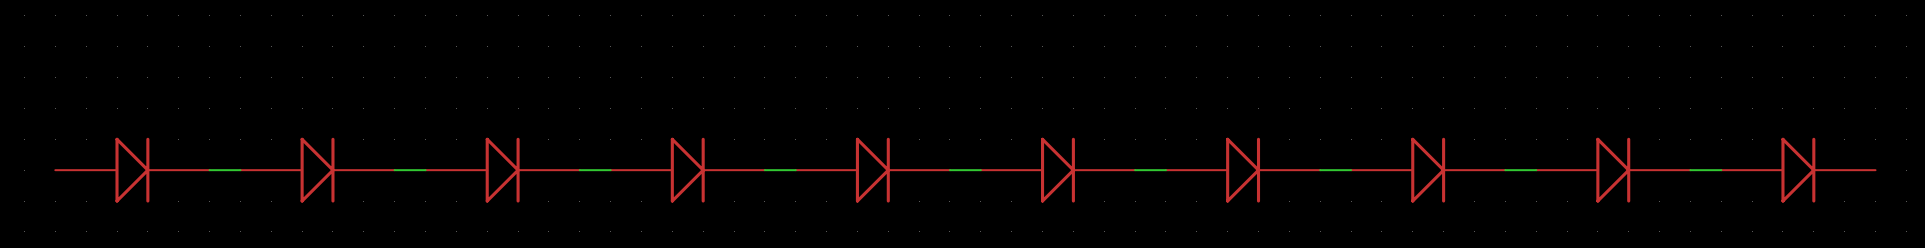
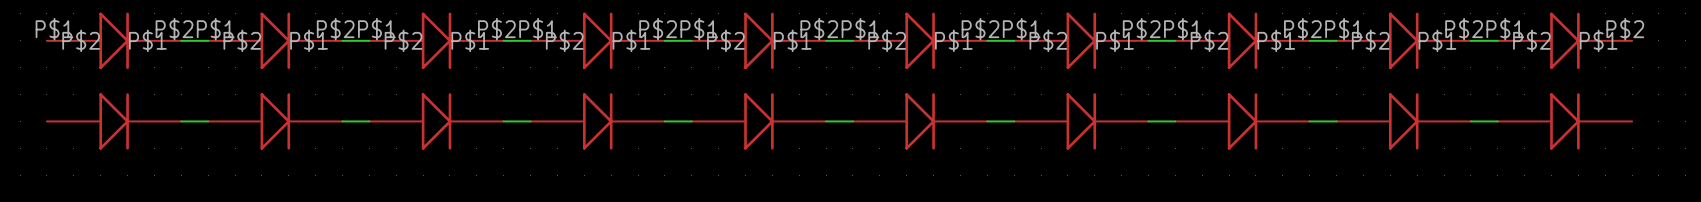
part: none -> (114, 40)
wire: none -> (181, 40) (208, 40)
part: none -> (275, 40)
wire: none -> (342, 40) (369, 40)
part: none -> (436, 40)
wire: none -> (503, 40) (530, 40)
part: none -> (597, 40)
wire: none -> (664, 40) (691, 40)
part: none -> (758, 40)
wire: none -> (826, 40) (852, 40)
part: none -> (920, 40)
wire: none -> (987, 40) (1014, 40)
part: none -> (1081, 40)
wire: none -> (1148, 40) (1175, 40)
part: none -> (1242, 40)
wire: none -> (1309, 40) (1336, 40)
part: none -> (1403, 40)
wire: none -> (1470, 40) (1497, 40)
part: none -> (1564, 40)

